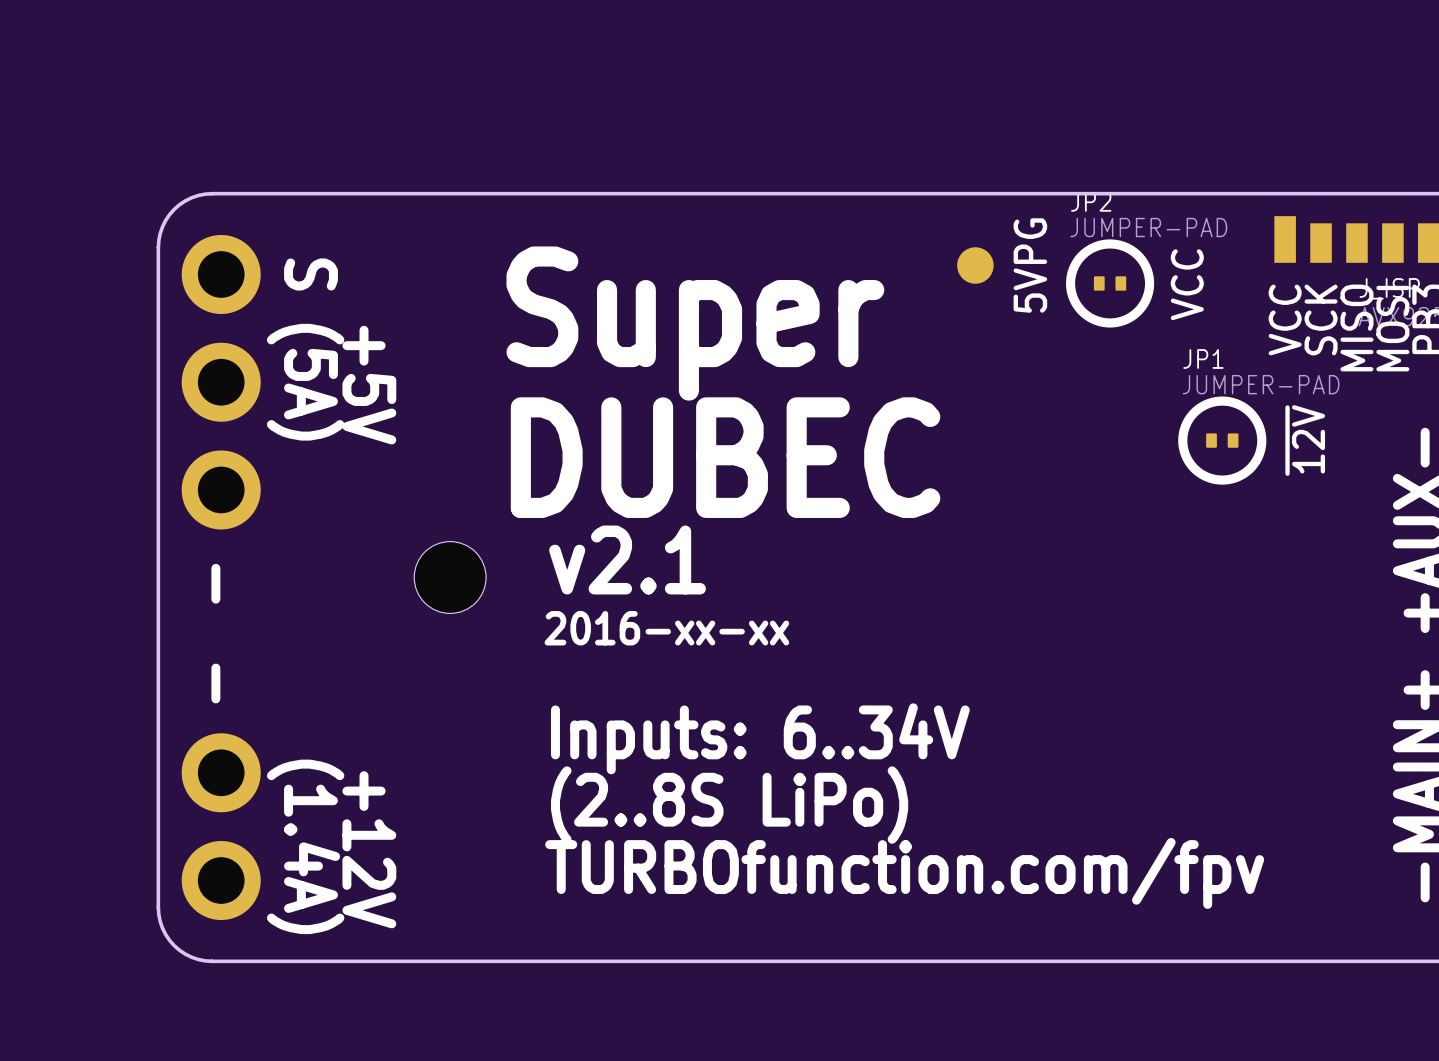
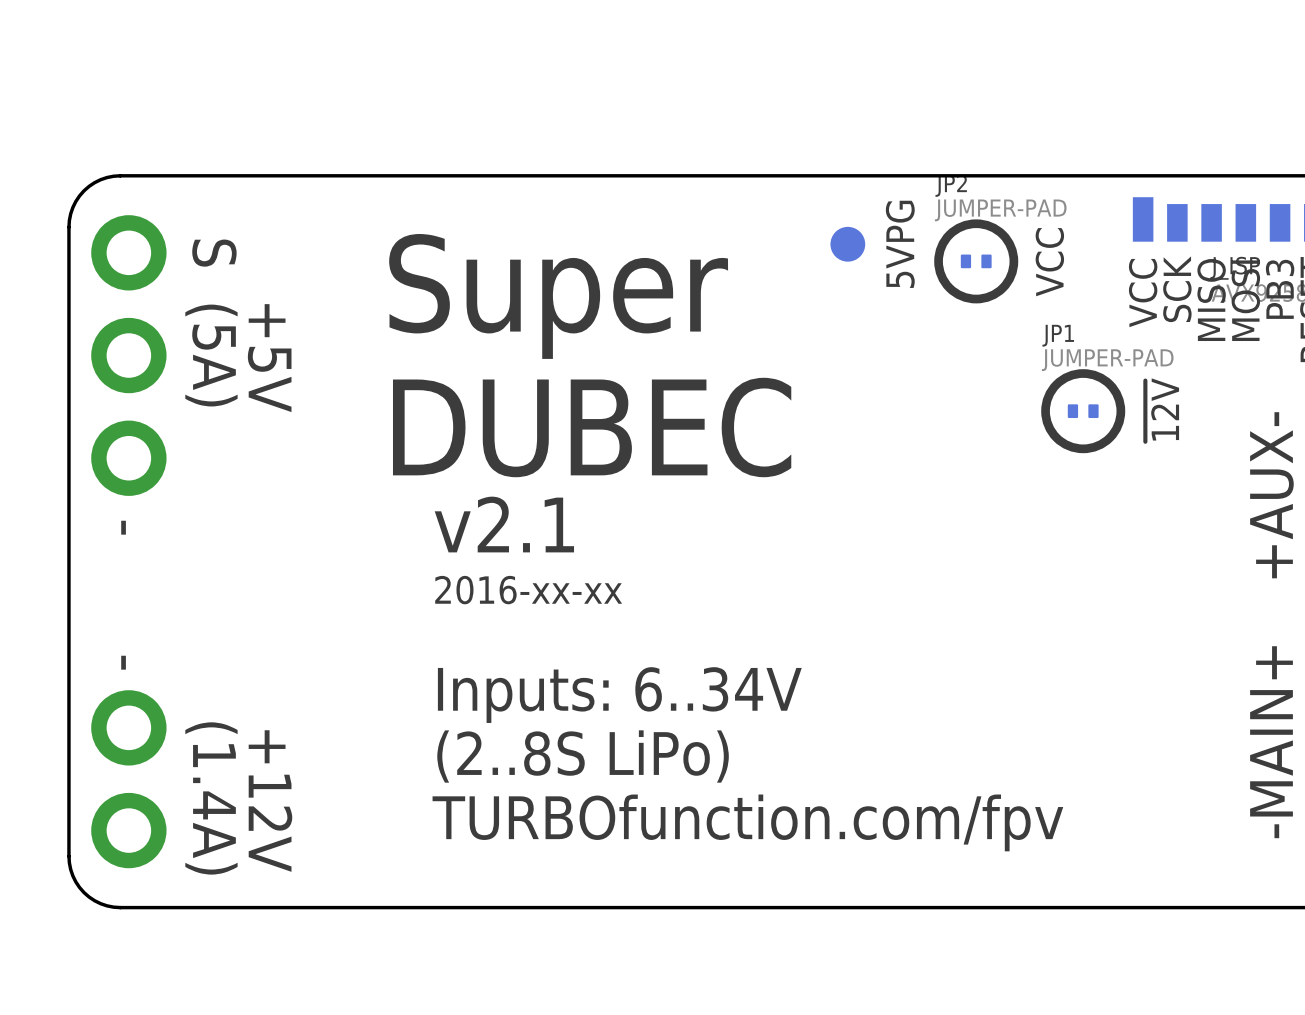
hole: (450, 577) -> none

